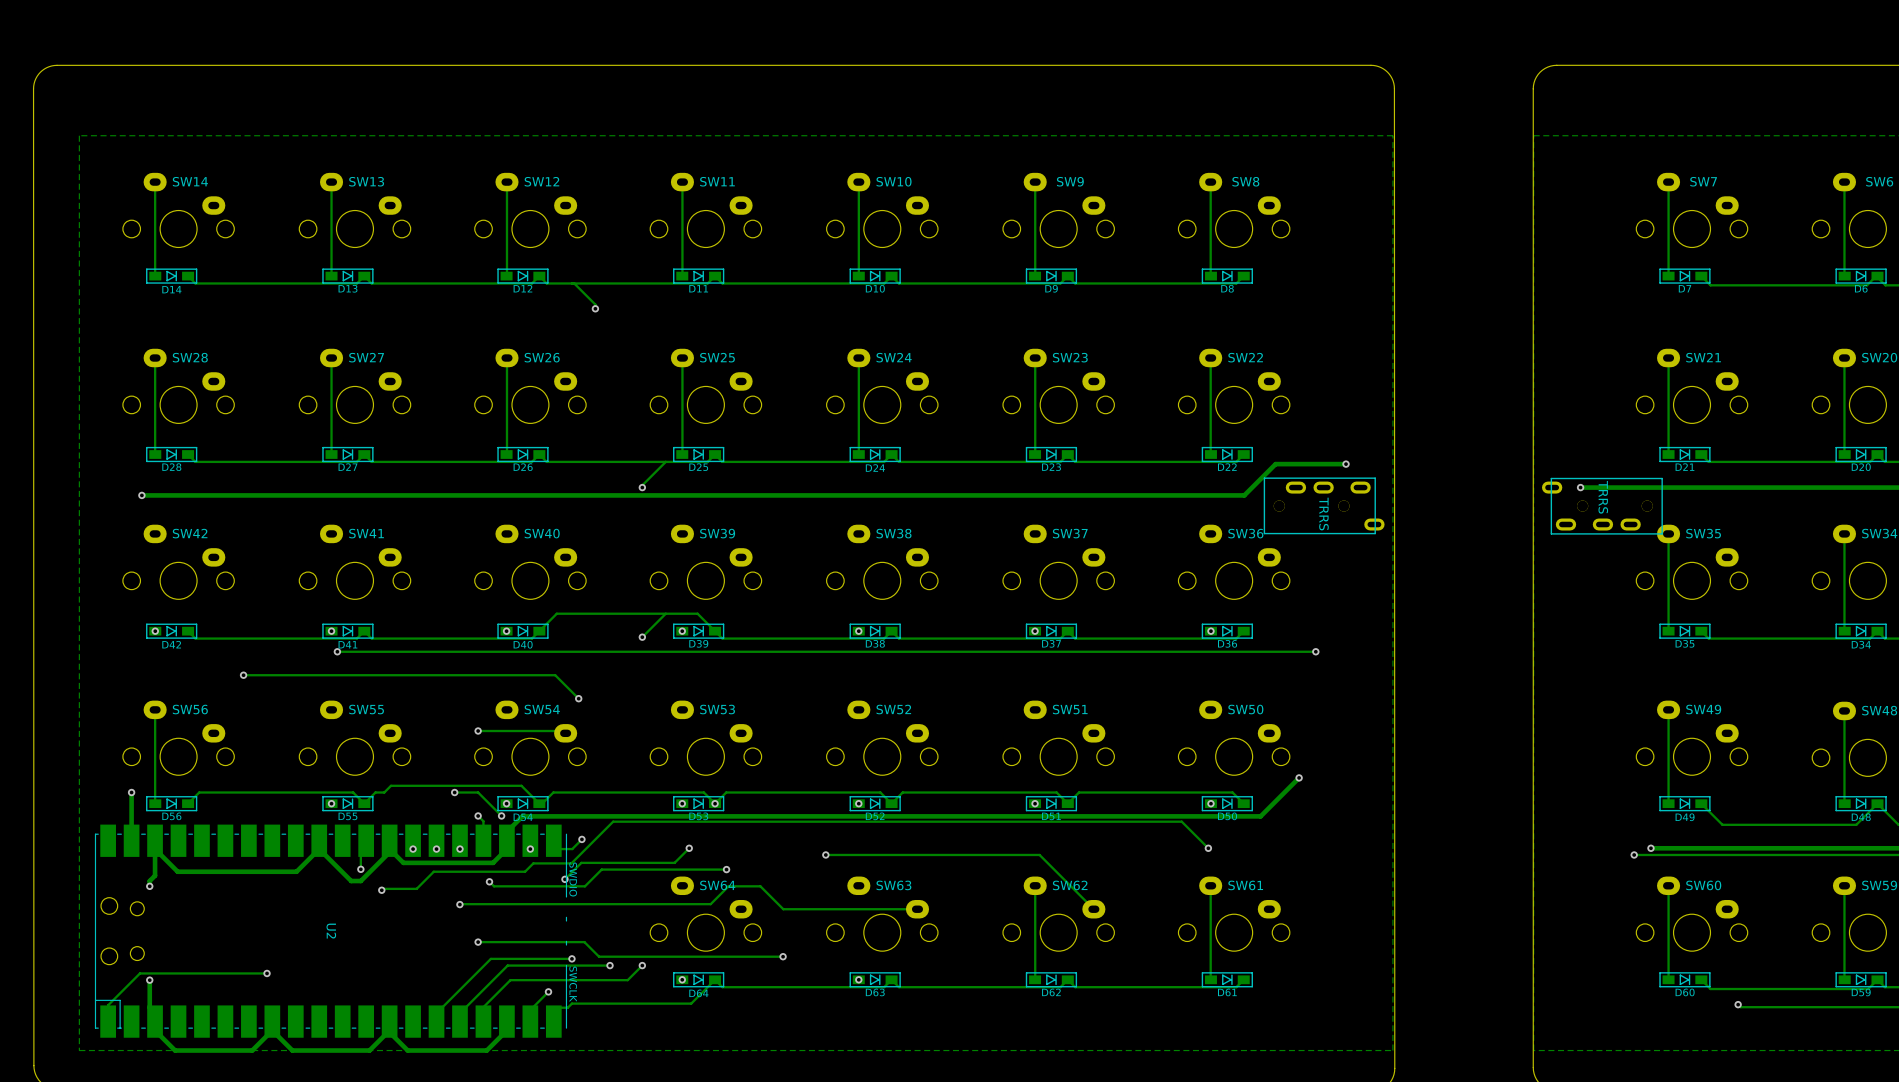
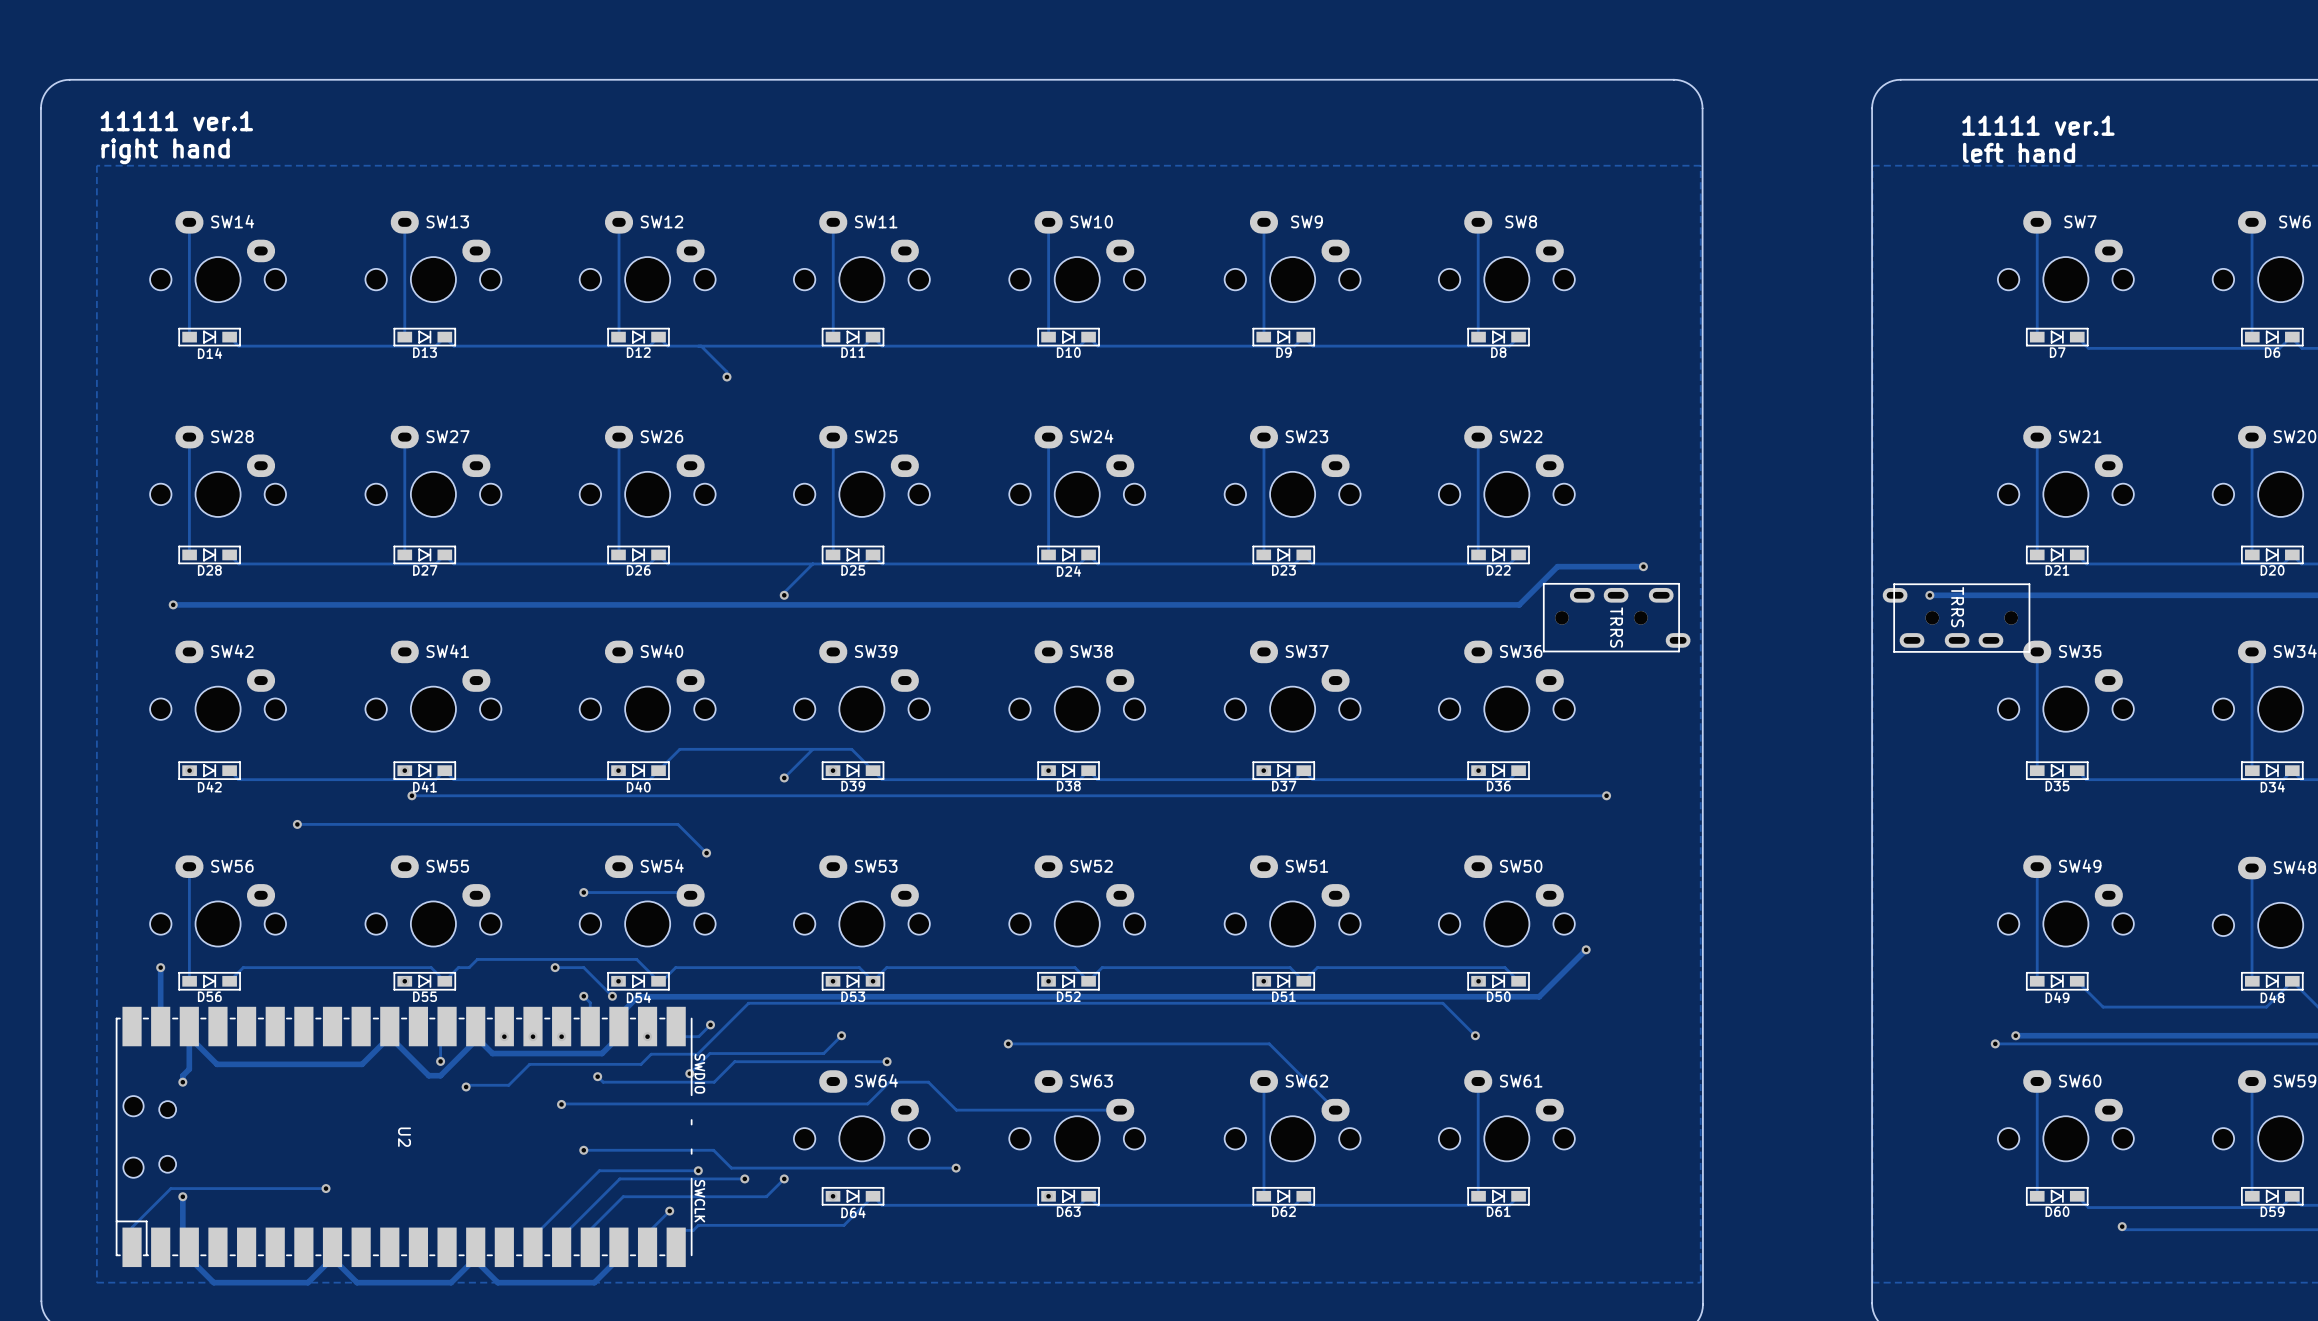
text: none -> 11111 ver.1 (176, 121)
text: none -> 11111 ver.1 (2038, 125)
text: none -> right hand (165, 151)
text: none -> left hand (2019, 152)

